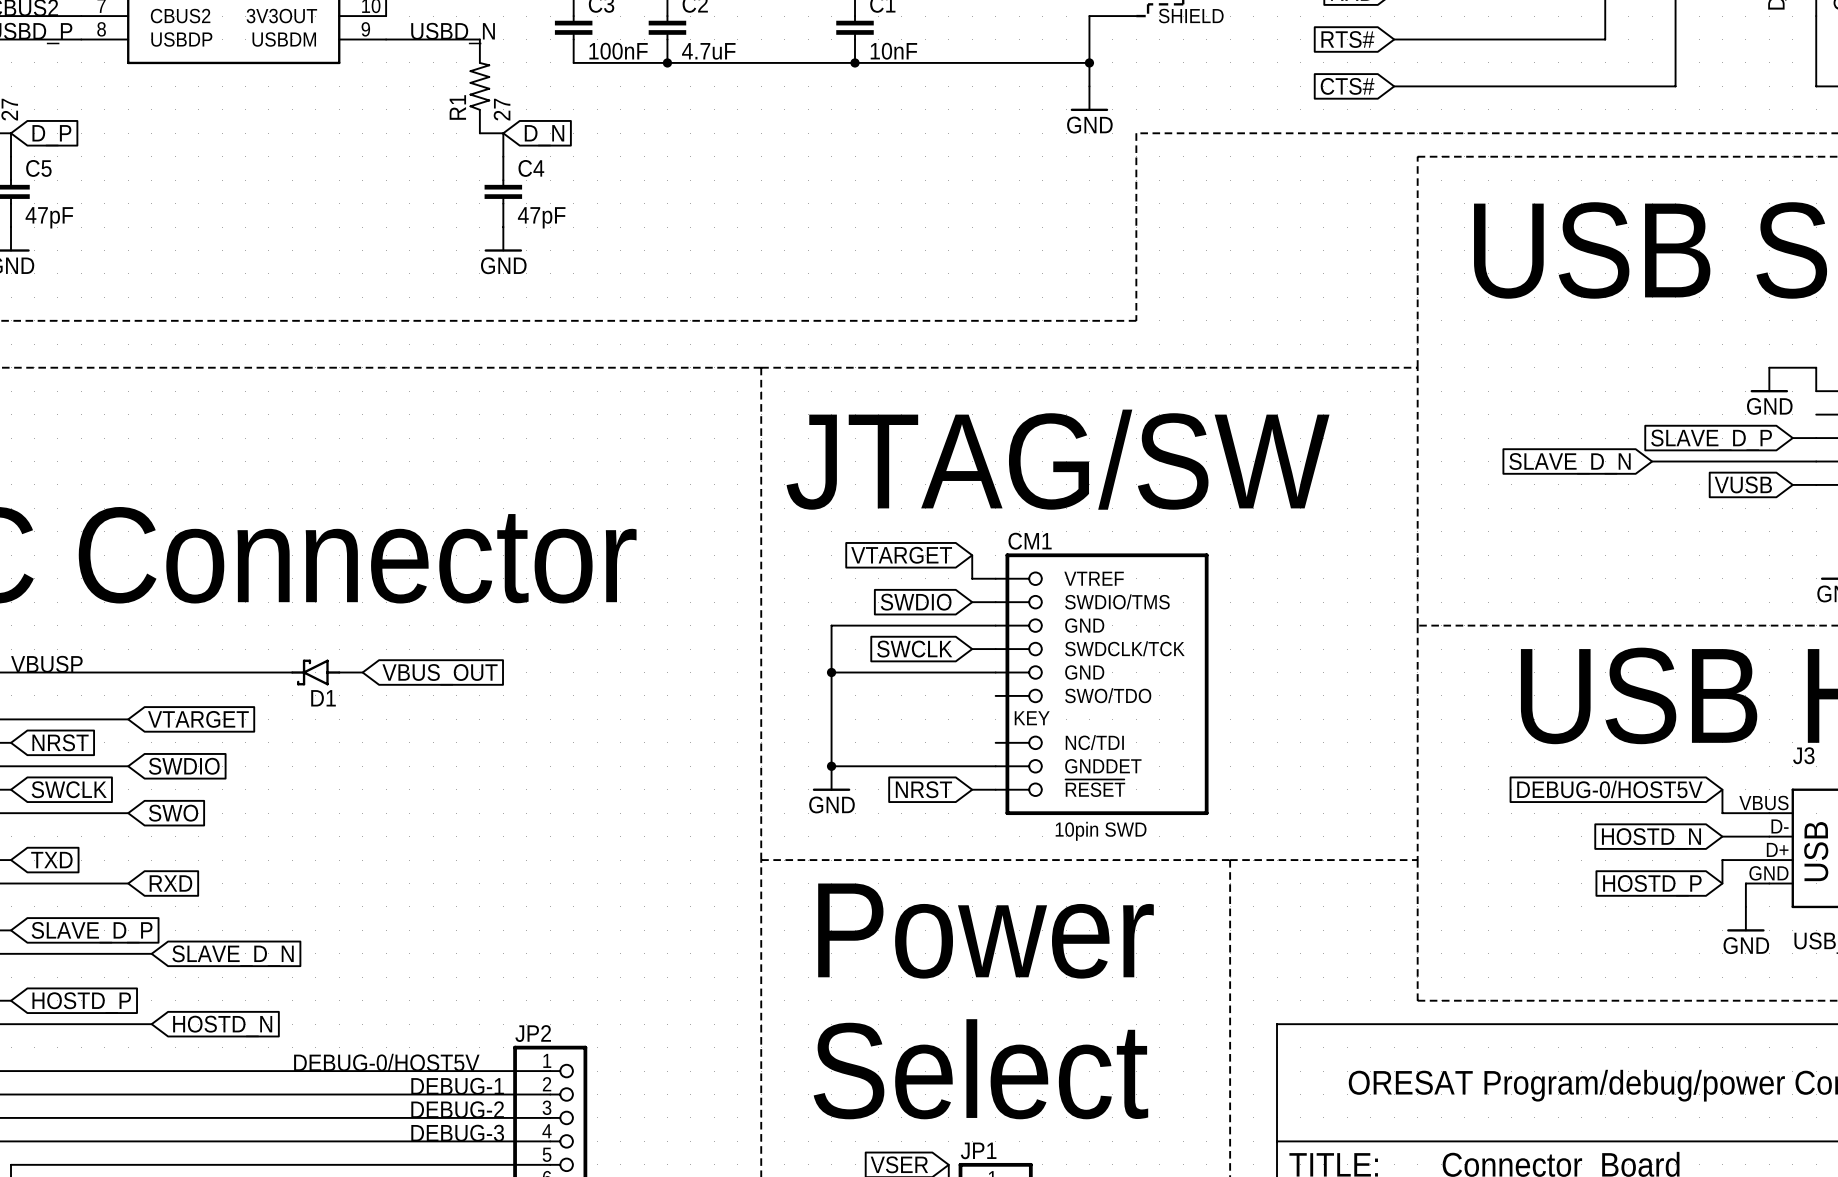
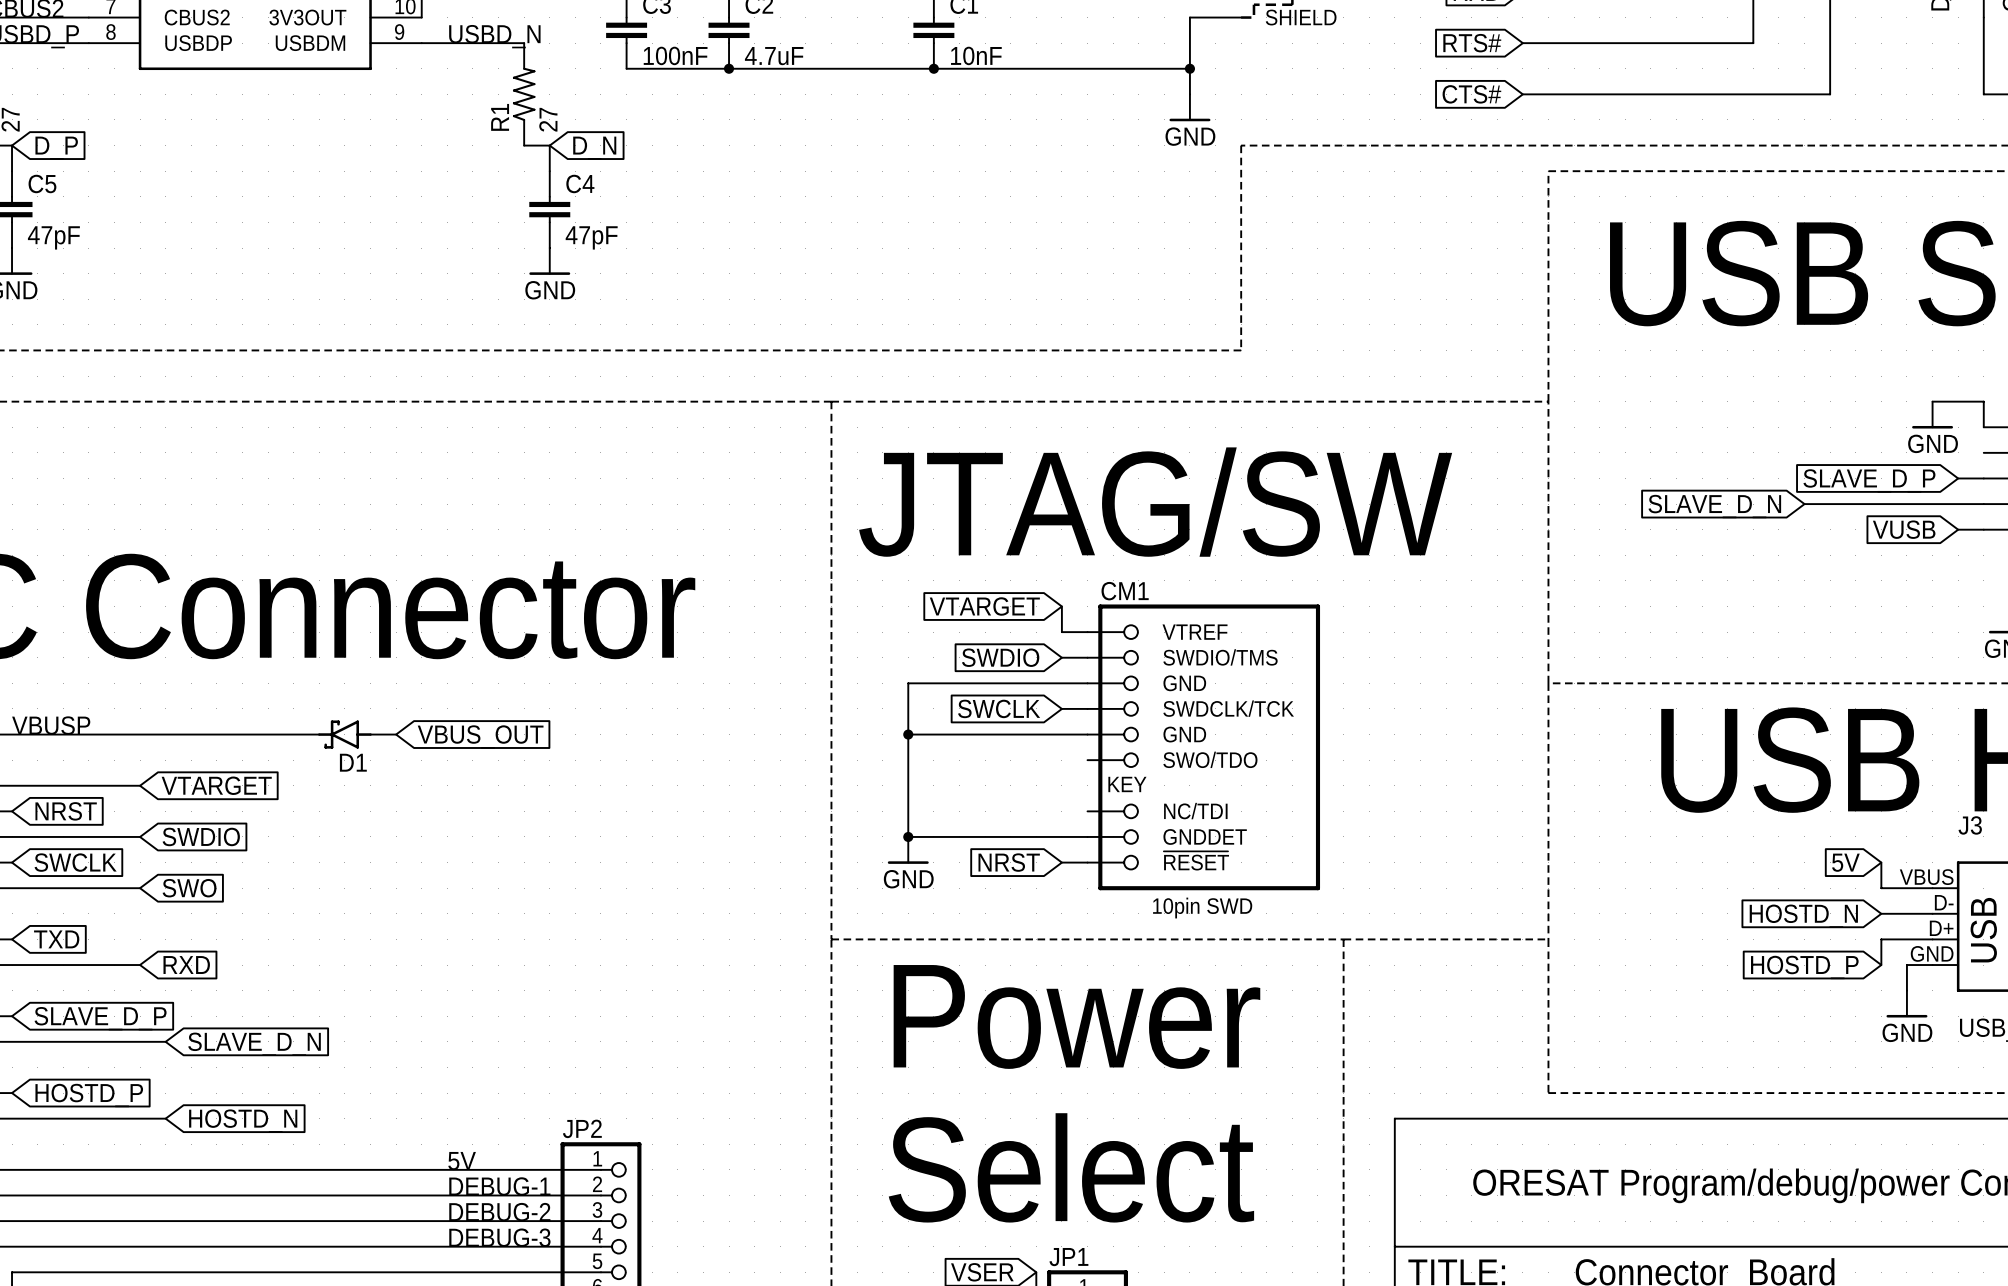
global label: DEBUG-0/HOST5V (1609, 789) -> 5V (1845, 862)
label: DEBUG-0/HOST5V (386, 1062) -> none
label: none -> 5V (462, 1161)

